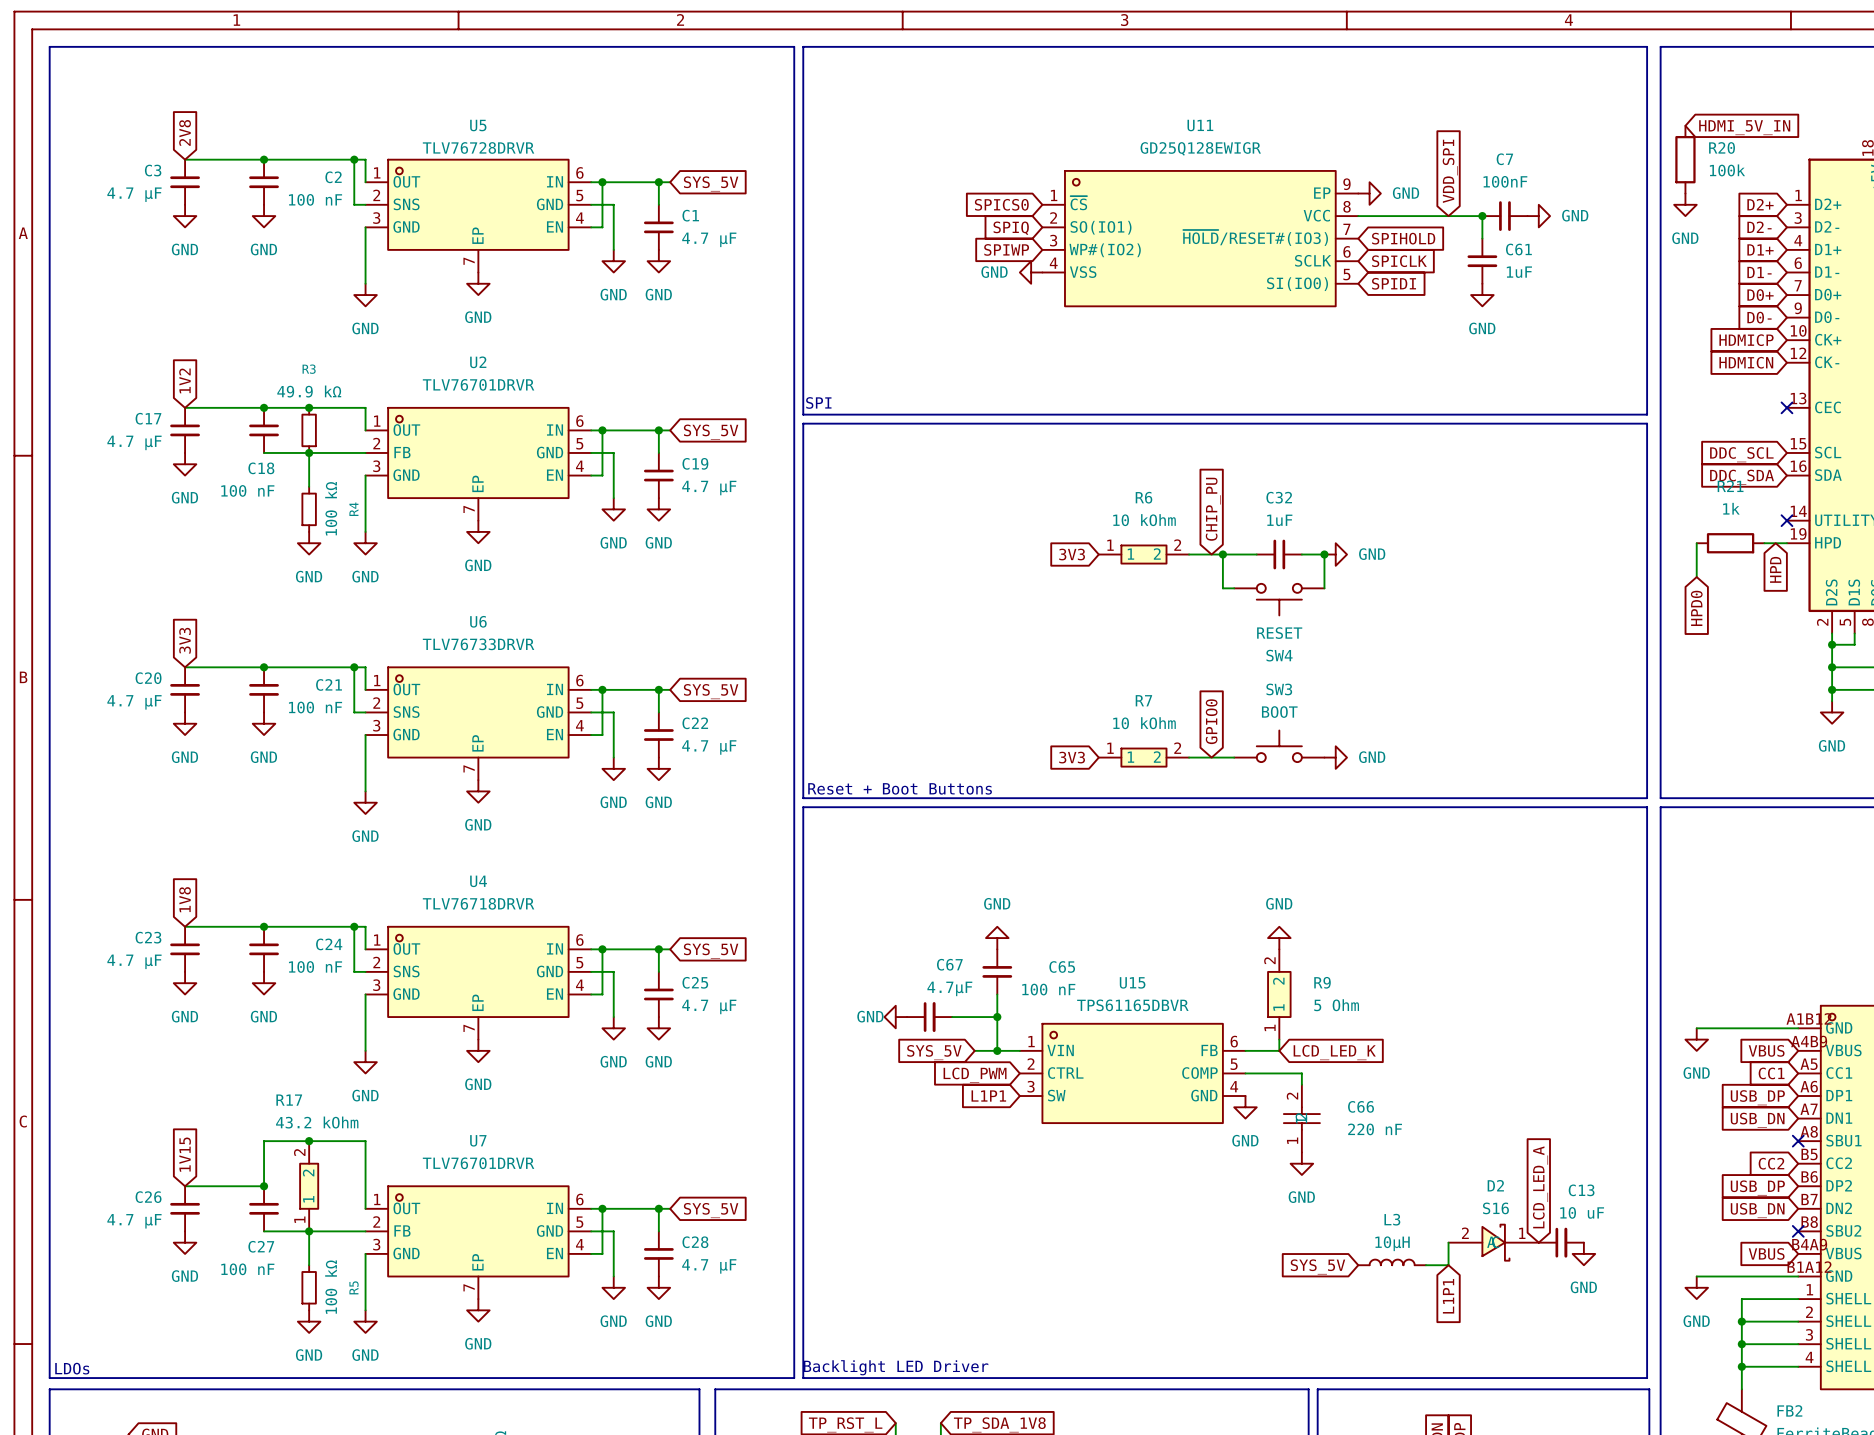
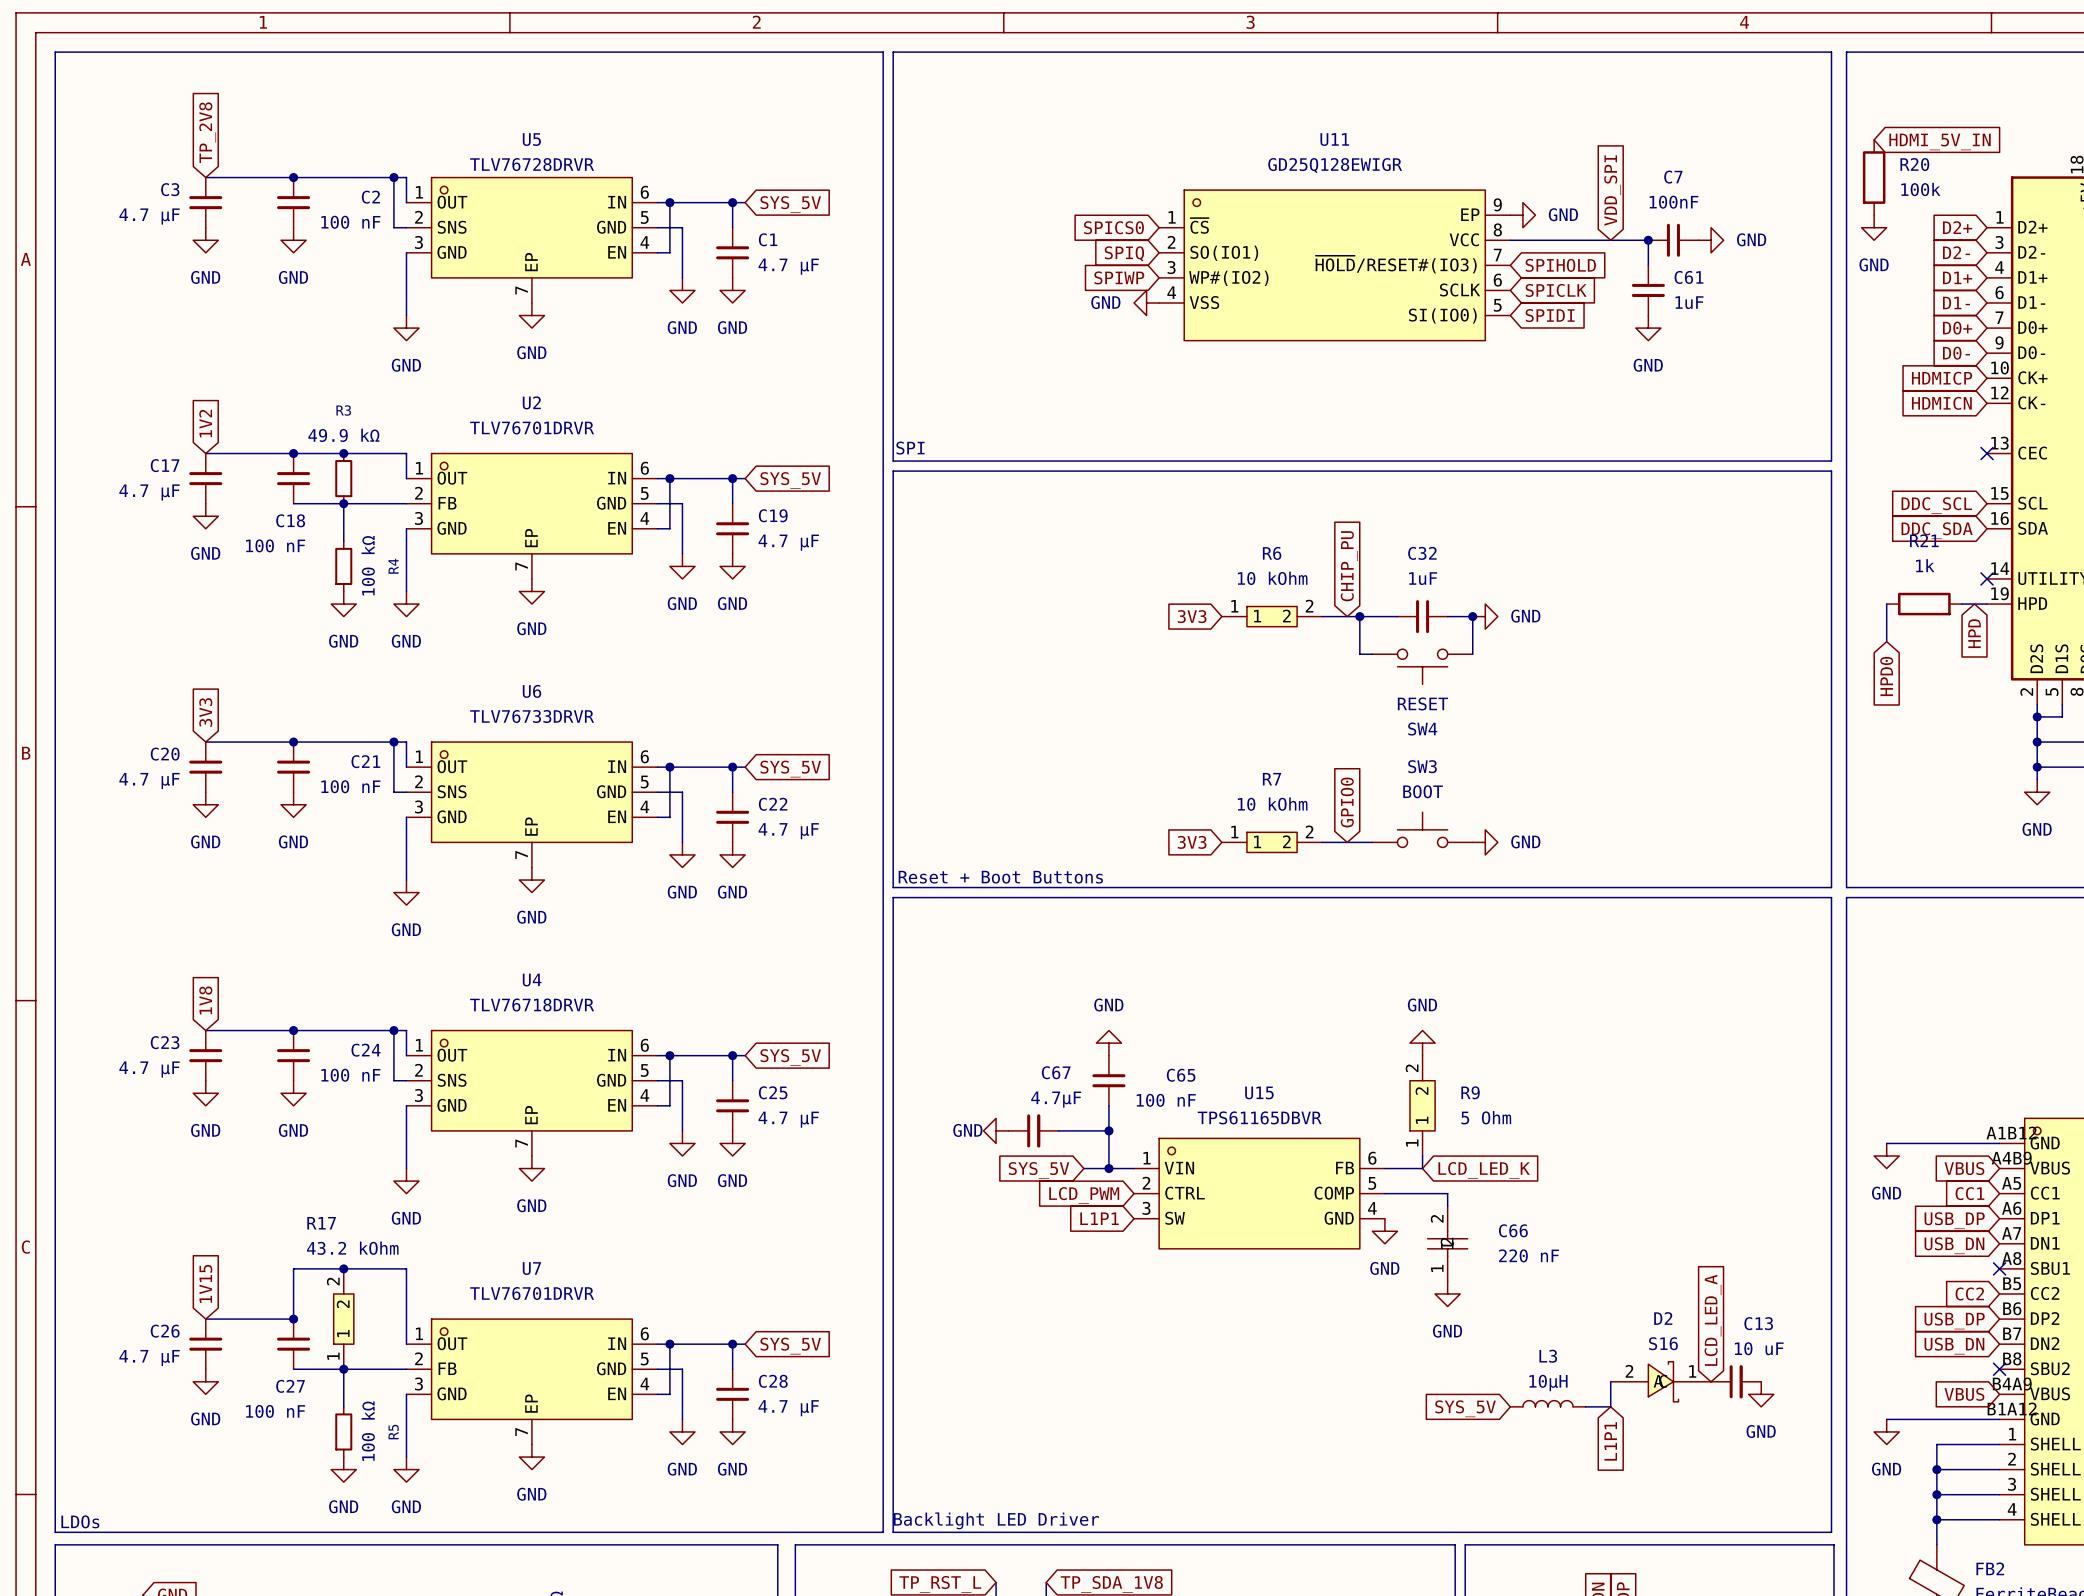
global label: 2V8 (185, 132) -> TP_2V8 (207, 132)

